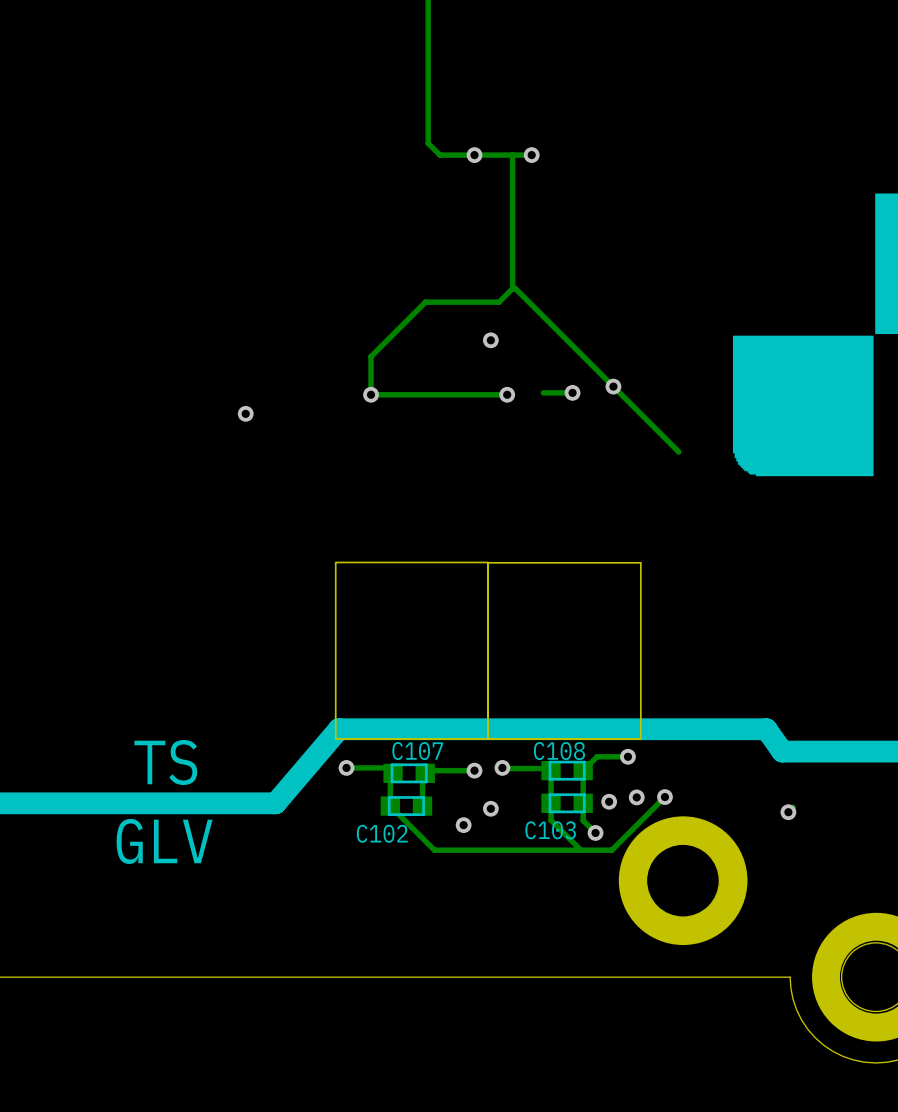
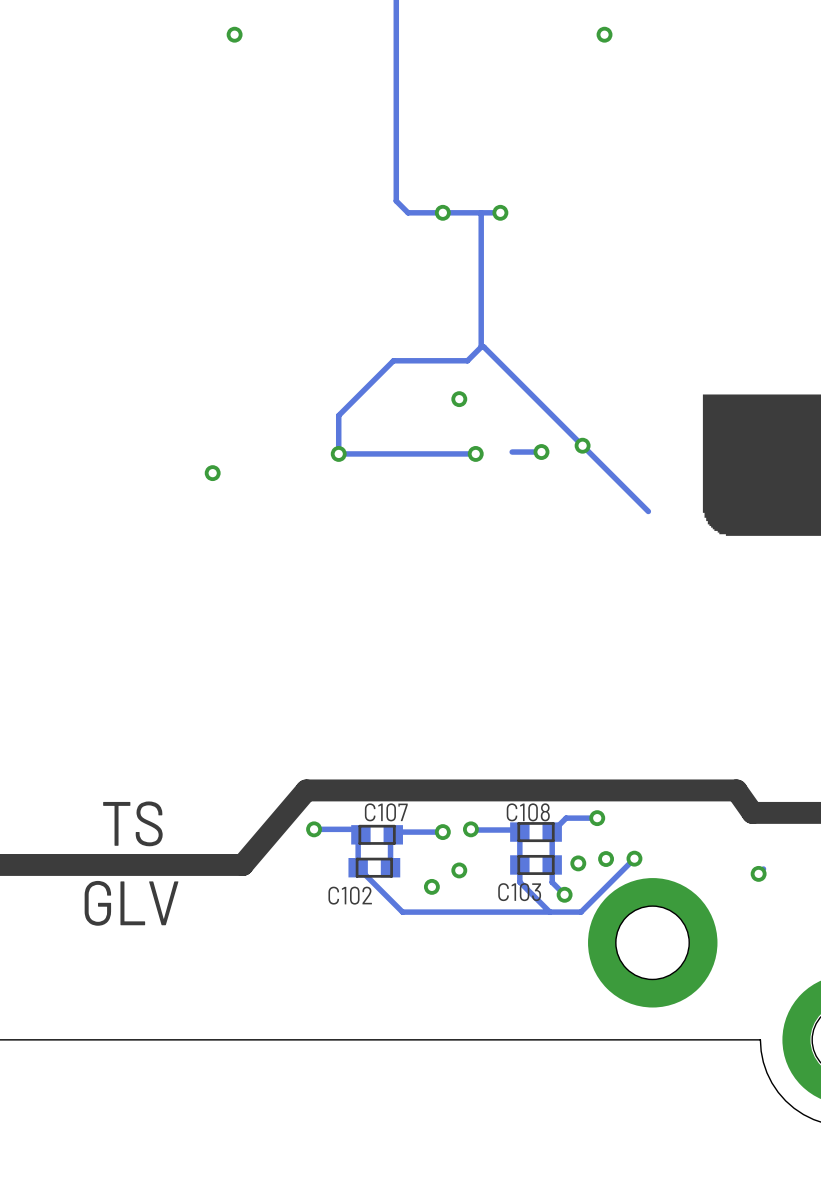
part: (411, 650) -> none
part: (564, 650) -> none

